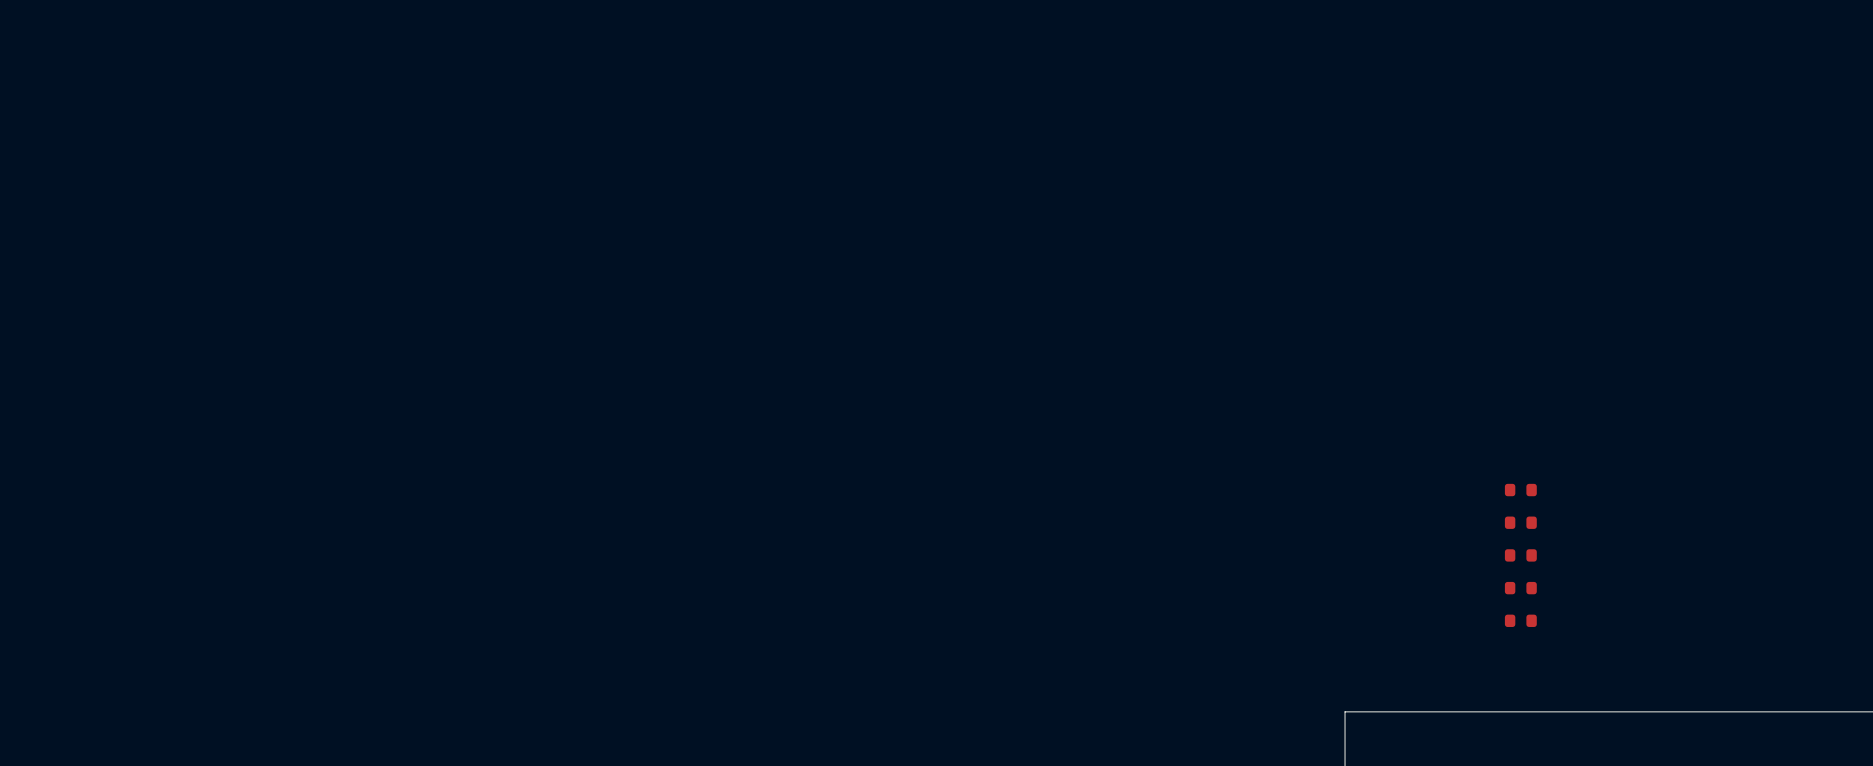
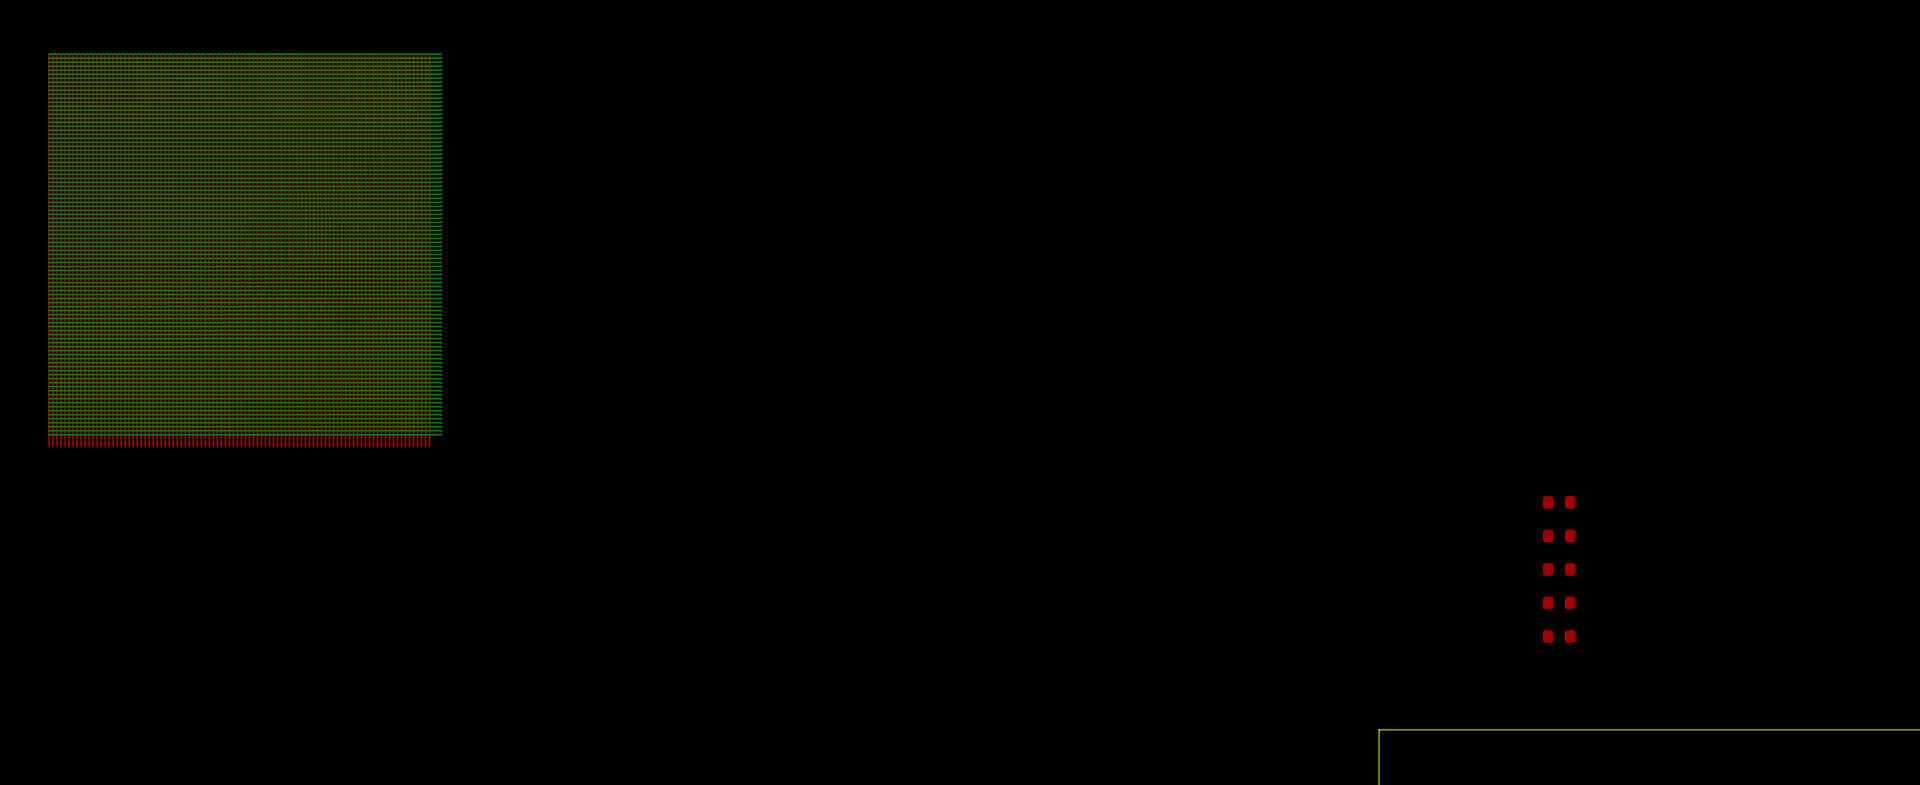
top track: none -> (49, 54) (49, 446)
top track: none -> (53, 54) (53, 446)
top track: none -> (57, 54) (57, 446)
top track: none -> (61, 54) (61, 446)
top track: none -> (65, 54) (65, 446)
top track: none -> (69, 54) (69, 446)
top track: none -> (73, 54) (73, 446)
top track: none -> (77, 54) (77, 446)
top track: none -> (81, 54) (81, 446)
top track: none -> (85, 54) (85, 446)
top track: none -> (89, 54) (89, 446)
top track: none -> (93, 54) (93, 446)
top track: none -> (97, 54) (97, 446)
top track: none -> (101, 54) (101, 446)
top track: none -> (105, 54) (105, 446)
top track: none -> (109, 54) (109, 446)
top track: none -> (113, 54) (113, 446)
top track: none -> (117, 54) (117, 446)
top track: none -> (121, 54) (121, 446)
top track: none -> (125, 54) (125, 446)
top track: none -> (129, 54) (129, 446)
top track: none -> (133, 54) (133, 446)
top track: none -> (137, 54) (137, 446)
top track: none -> (141, 54) (141, 446)
top track: none -> (145, 54) (145, 446)
top track: none -> (149, 54) (149, 446)
top track: none -> (153, 54) (153, 446)
top track: none -> (157, 54) (157, 446)
top track: none -> (161, 54) (161, 446)
top track: none -> (165, 54) (165, 446)
top track: none -> (169, 54) (169, 446)
top track: none -> (173, 54) (173, 446)
top track: none -> (177, 54) (177, 446)
top track: none -> (181, 54) (181, 446)
top track: none -> (185, 54) (185, 446)
top track: none -> (189, 54) (189, 446)
top track: none -> (193, 54) (193, 446)
top track: none -> (197, 54) (197, 446)
top track: none -> (201, 54) (201, 446)
top track: none -> (205, 54) (205, 446)
top track: none -> (209, 54) (209, 446)
top track: none -> (213, 54) (213, 446)
top track: none -> (217, 54) (217, 446)
top track: none -> (221, 54) (221, 446)
top track: none -> (225, 54) (225, 446)
top track: none -> (229, 54) (229, 446)
top track: none -> (233, 54) (233, 446)
top track: none -> (237, 54) (237, 446)
top track: none -> (241, 54) (241, 446)
top track: none -> (245, 54) (245, 446)
top track: none -> (249, 54) (249, 446)
top track: none -> (253, 54) (253, 446)
top track: none -> (257, 54) (257, 446)
top track: none -> (261, 54) (261, 446)
top track: none -> (265, 54) (265, 446)
top track: none -> (269, 54) (269, 446)
top track: none -> (273, 54) (273, 446)
top track: none -> (277, 54) (277, 446)
top track: none -> (281, 54) (281, 446)
top track: none -> (285, 54) (285, 446)
top track: none -> (289, 54) (289, 446)
top track: none -> (293, 54) (293, 446)
top track: none -> (297, 54) (297, 446)
top track: none -> (301, 54) (301, 446)
top track: none -> (305, 54) (305, 446)
top track: none -> (309, 54) (309, 446)
top track: none -> (313, 54) (313, 446)
top track: none -> (317, 54) (317, 446)
top track: none -> (321, 54) (321, 446)
top track: none -> (325, 54) (325, 446)
top track: none -> (329, 54) (329, 446)
top track: none -> (333, 54) (333, 446)
top track: none -> (337, 54) (337, 446)
top track: none -> (341, 54) (341, 446)
top track: none -> (345, 54) (345, 446)
top track: none -> (349, 54) (349, 446)
top track: none -> (353, 54) (353, 446)
top track: none -> (357, 54) (357, 446)
top track: none -> (361, 54) (361, 446)
top track: none -> (365, 54) (365, 446)
top track: none -> (369, 54) (369, 446)
top track: none -> (373, 54) (373, 446)
top track: none -> (377, 54) (377, 446)
top track: none -> (381, 54) (381, 446)
top track: none -> (385, 54) (385, 446)
top track: none -> (389, 54) (389, 446)
top track: none -> (393, 54) (393, 446)
top track: none -> (397, 54) (397, 446)
top track: none -> (401, 54) (401, 446)
top track: none -> (405, 54) (405, 446)
top track: none -> (409, 54) (409, 446)
top track: none -> (413, 54) (413, 446)
top track: none -> (417, 54) (417, 446)
top track: none -> (421, 54) (421, 446)
top track: none -> (425, 54) (425, 446)
top track: none -> (429, 54) (429, 446)
bottom track: none -> (441, 54) (49, 54)
bottom track: none -> (441, 58) (49, 58)
bottom track: none -> (441, 62) (49, 62)
bottom track: none -> (441, 66) (49, 66)
bottom track: none -> (441, 70) (49, 70)
bottom track: none -> (441, 74) (49, 74)
bottom track: none -> (441, 78) (49, 78)
bottom track: none -> (441, 82) (49, 82)
bottom track: none -> (441, 86) (49, 86)
bottom track: none -> (441, 90) (49, 90)
bottom track: none -> (441, 94) (49, 94)
bottom track: none -> (441, 98) (49, 98)
bottom track: none -> (441, 102) (49, 102)
bottom track: none -> (441, 106) (49, 106)
bottom track: none -> (441, 110) (49, 110)
bottom track: none -> (441, 114) (49, 114)
bottom track: none -> (441, 118) (49, 118)
bottom track: none -> (441, 122) (49, 122)
bottom track: none -> (441, 126) (49, 126)
bottom track: none -> (441, 130) (49, 130)
bottom track: none -> (441, 134) (49, 134)
bottom track: none -> (441, 138) (49, 138)
bottom track: none -> (441, 142) (49, 142)
bottom track: none -> (441, 146) (49, 146)
bottom track: none -> (441, 150) (49, 150)
bottom track: none -> (441, 154) (49, 154)
bottom track: none -> (441, 158) (49, 158)
bottom track: none -> (441, 162) (49, 162)
bottom track: none -> (441, 166) (49, 166)
bottom track: none -> (441, 170) (49, 170)
bottom track: none -> (441, 174) (49, 174)
bottom track: none -> (441, 178) (49, 178)
bottom track: none -> (441, 182) (49, 182)
bottom track: none -> (441, 186) (49, 186)
bottom track: none -> (441, 190) (49, 190)
bottom track: none -> (441, 194) (49, 194)
bottom track: none -> (441, 198) (49, 198)
bottom track: none -> (441, 202) (49, 202)
bottom track: none -> (441, 206) (49, 206)
bottom track: none -> (441, 210) (49, 210)
bottom track: none -> (441, 214) (49, 214)
bottom track: none -> (441, 218) (49, 218)
bottom track: none -> (441, 222) (49, 222)
bottom track: none -> (441, 226) (49, 226)
bottom track: none -> (441, 230) (49, 230)
bottom track: none -> (441, 234) (49, 234)
bottom track: none -> (441, 238) (49, 238)
bottom track: none -> (441, 242) (49, 242)
bottom track: none -> (441, 246) (49, 246)
bottom track: none -> (441, 250) (49, 250)
bottom track: none -> (441, 254) (49, 254)
bottom track: none -> (441, 258) (49, 258)
bottom track: none -> (441, 262) (49, 262)
bottom track: none -> (441, 266) (49, 266)
bottom track: none -> (441, 270) (49, 270)
bottom track: none -> (441, 274) (49, 274)
bottom track: none -> (441, 278) (49, 278)
bottom track: none -> (441, 282) (49, 282)
bottom track: none -> (441, 286) (49, 286)
bottom track: none -> (441, 290) (49, 290)
bottom track: none -> (441, 294) (49, 294)
bottom track: none -> (441, 298) (49, 298)
bottom track: none -> (441, 302) (49, 302)
bottom track: none -> (441, 306) (49, 306)
bottom track: none -> (441, 310) (49, 310)
bottom track: none -> (441, 314) (49, 314)
bottom track: none -> (441, 318) (49, 318)
bottom track: none -> (441, 322) (49, 322)
bottom track: none -> (441, 326) (49, 326)
bottom track: none -> (441, 330) (49, 330)
bottom track: none -> (441, 334) (49, 334)
bottom track: none -> (441, 338) (49, 338)
bottom track: none -> (441, 342) (49, 342)
bottom track: none -> (441, 346) (49, 346)
bottom track: none -> (441, 350) (49, 350)
bottom track: none -> (441, 354) (49, 354)
bottom track: none -> (441, 358) (49, 358)
bottom track: none -> (441, 362) (49, 362)
bottom track: none -> (441, 366) (49, 366)
bottom track: none -> (441, 370) (49, 370)
bottom track: none -> (441, 374) (49, 374)
bottom track: none -> (441, 378) (49, 378)
bottom track: none -> (441, 382) (49, 382)
bottom track: none -> (441, 386) (49, 386)
bottom track: none -> (441, 390) (49, 390)
bottom track: none -> (441, 394) (49, 394)
bottom track: none -> (441, 398) (49, 398)
bottom track: none -> (441, 402) (49, 402)
bottom track: none -> (441, 406) (49, 406)
bottom track: none -> (441, 410) (49, 410)
bottom track: none -> (441, 414) (49, 414)
bottom track: none -> (441, 418) (49, 418)
bottom track: none -> (441, 422) (49, 422)
bottom track: none -> (441, 426) (49, 426)
bottom track: none -> (441, 430) (49, 430)
bottom track: none -> (441, 434) (49, 434)

